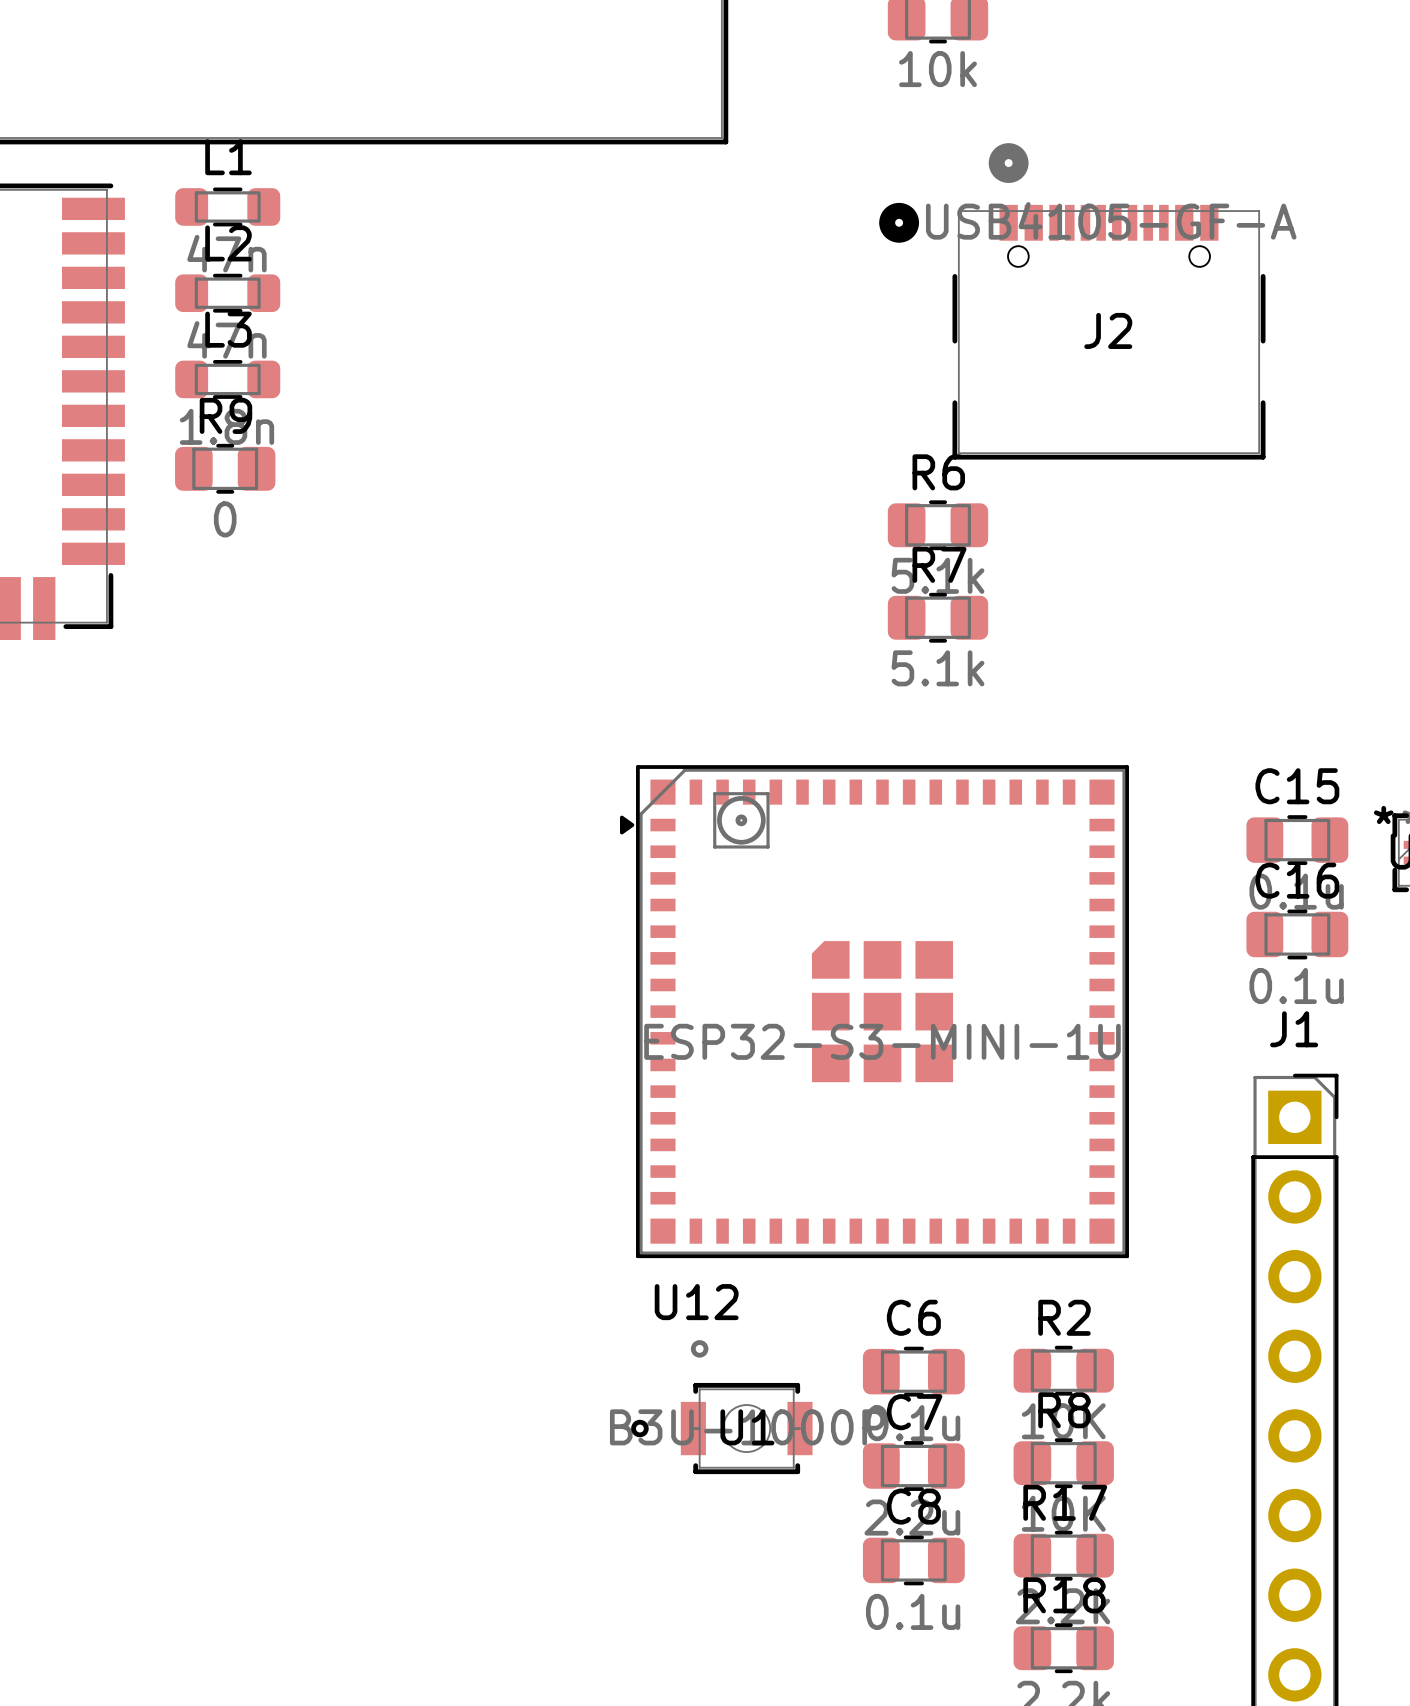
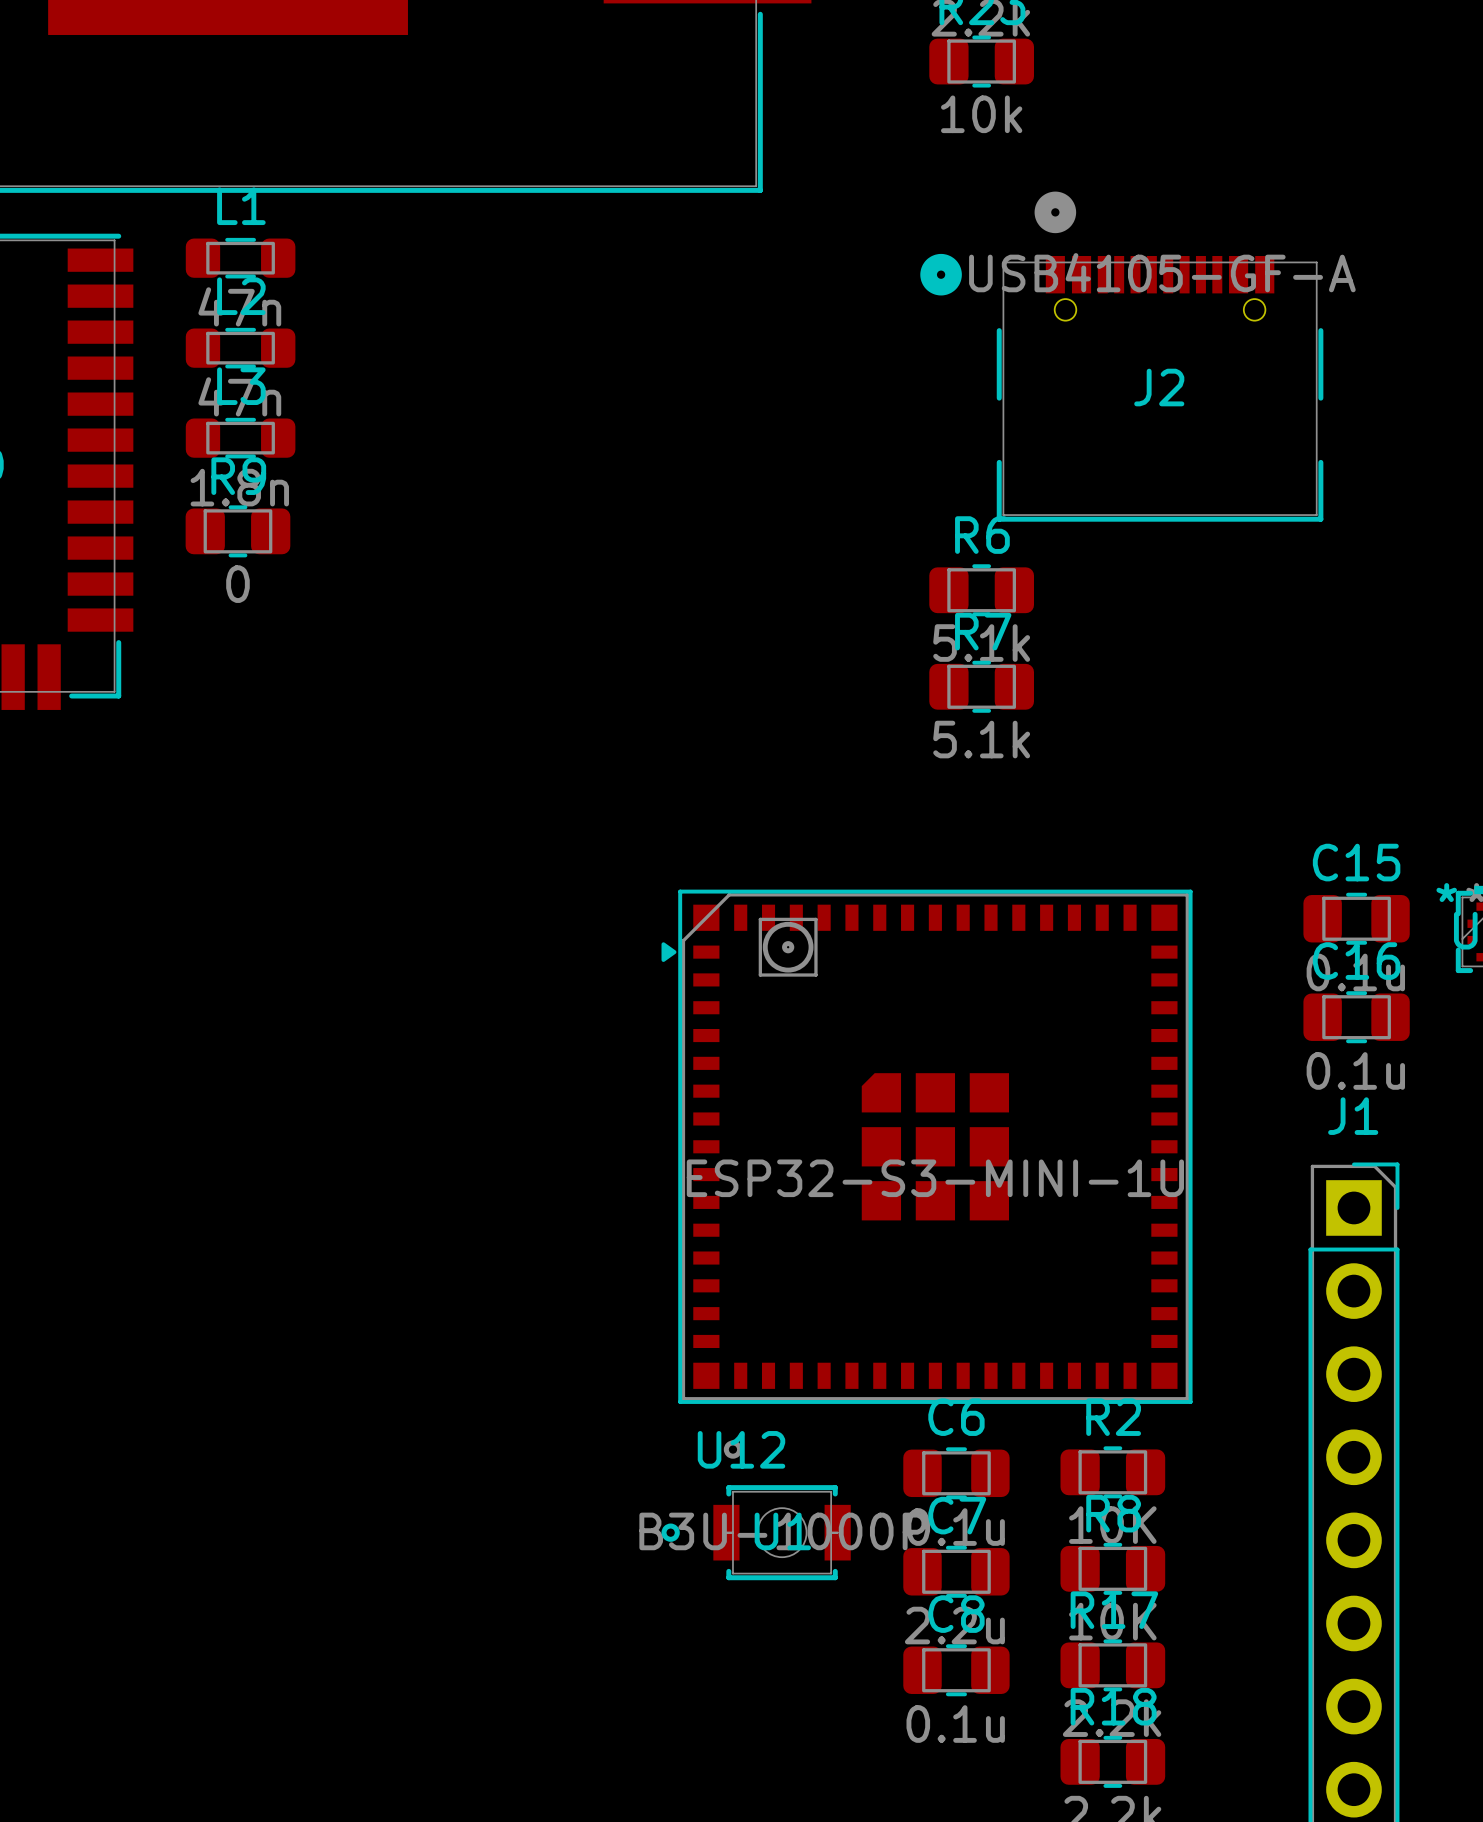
U12 position: (874, 1011) -> (927, 1146)

